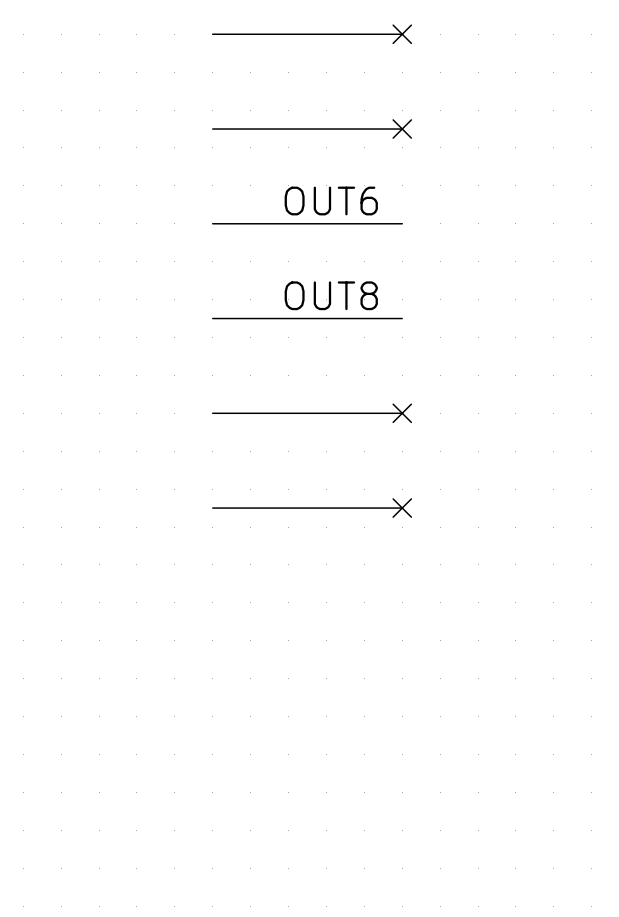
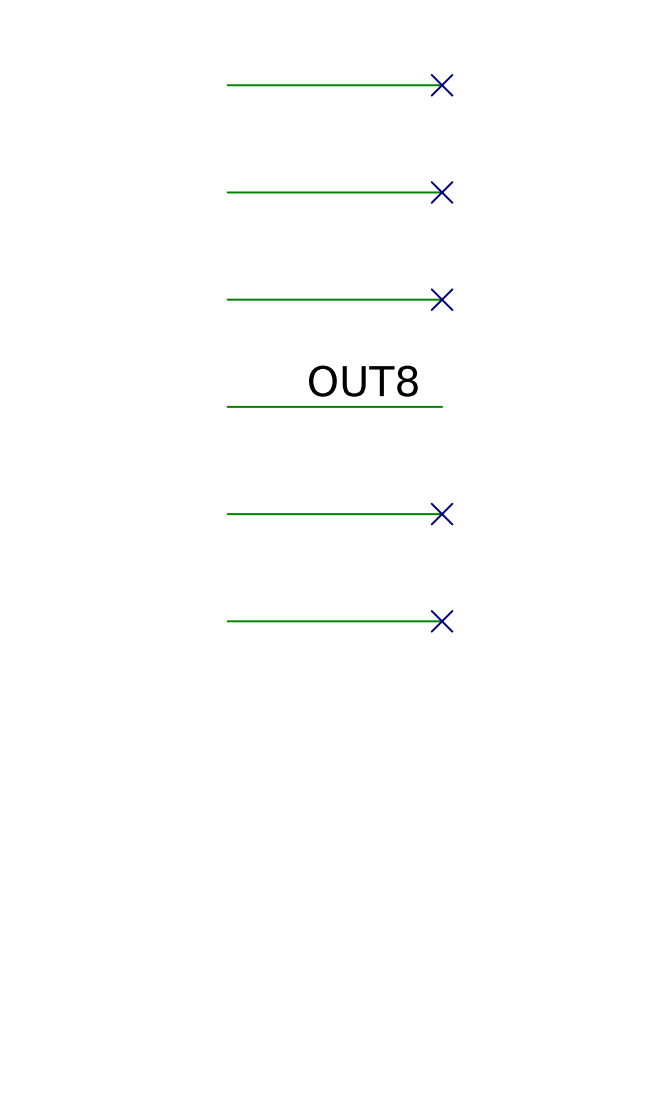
label: OUT6 (331, 201) -> none
no-connect mark: none -> (442, 299)

